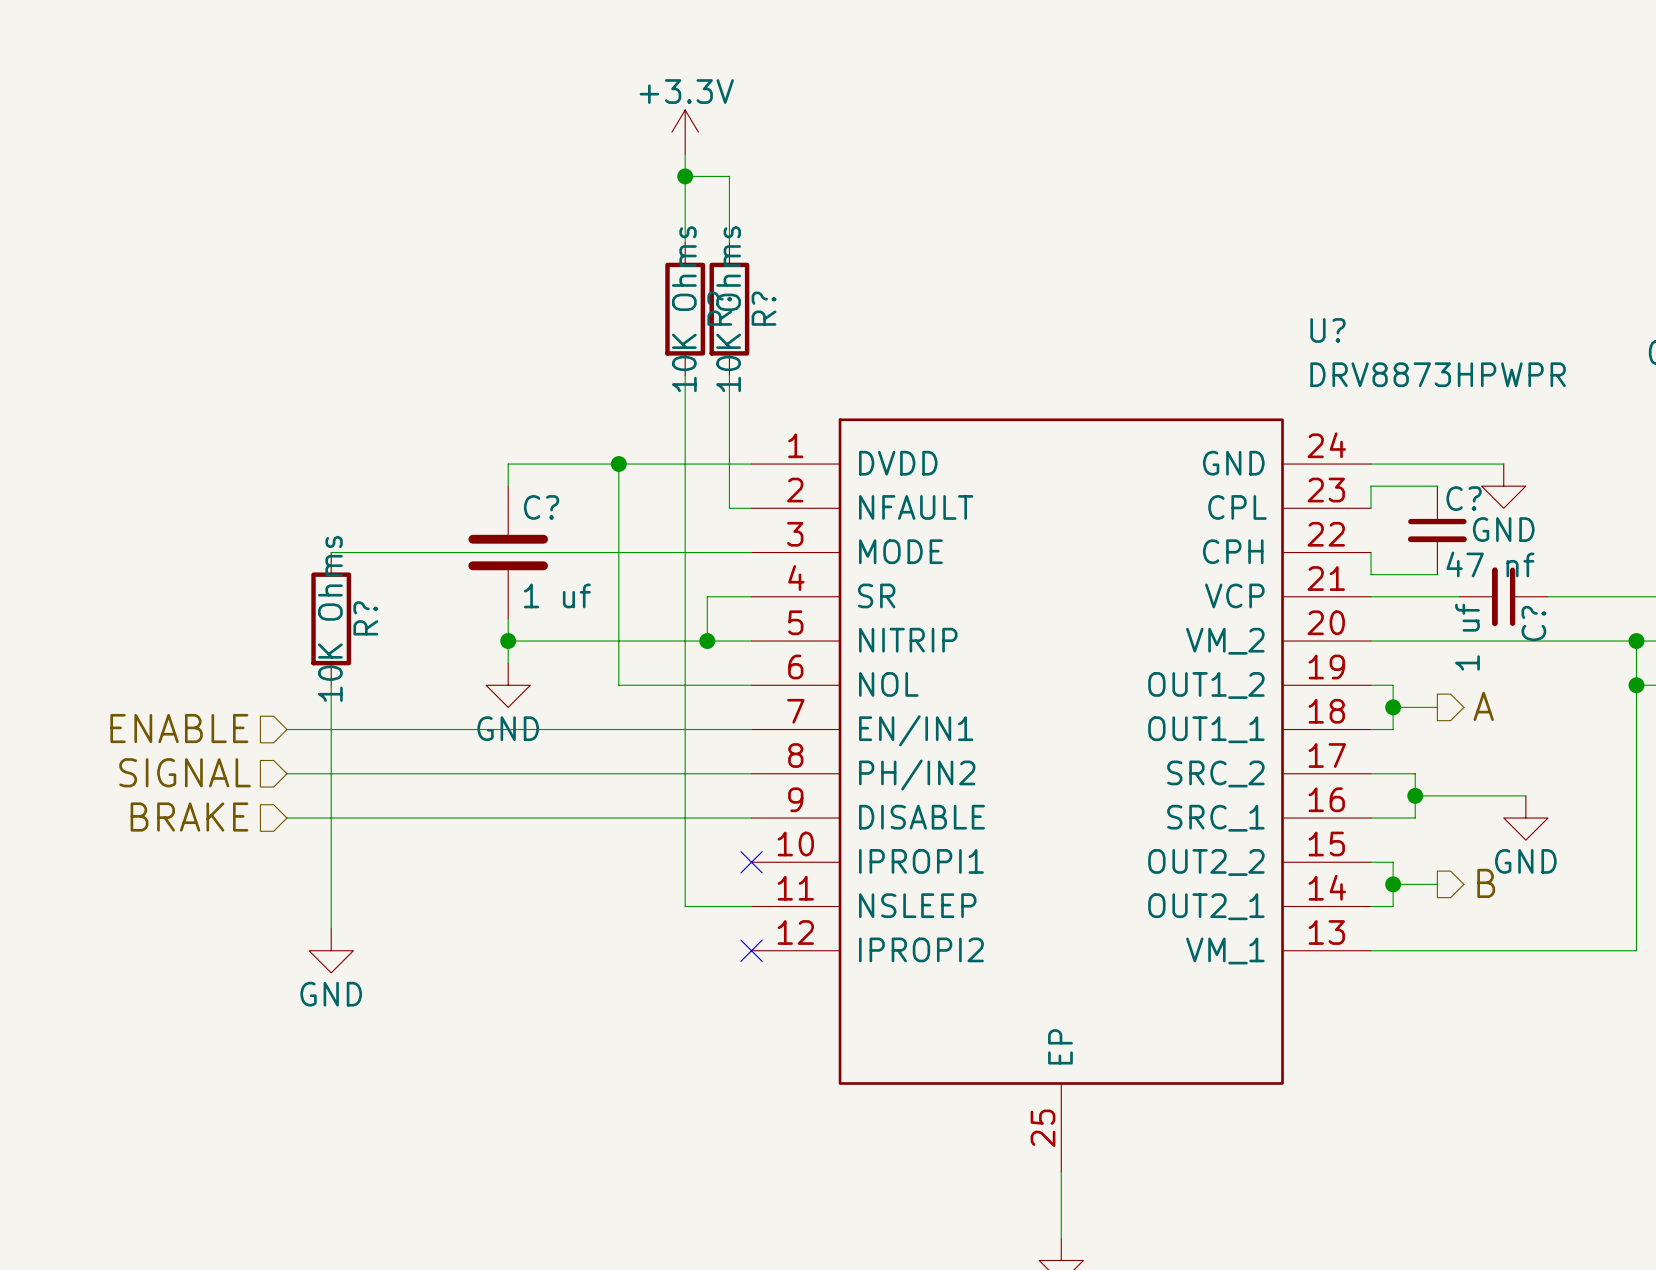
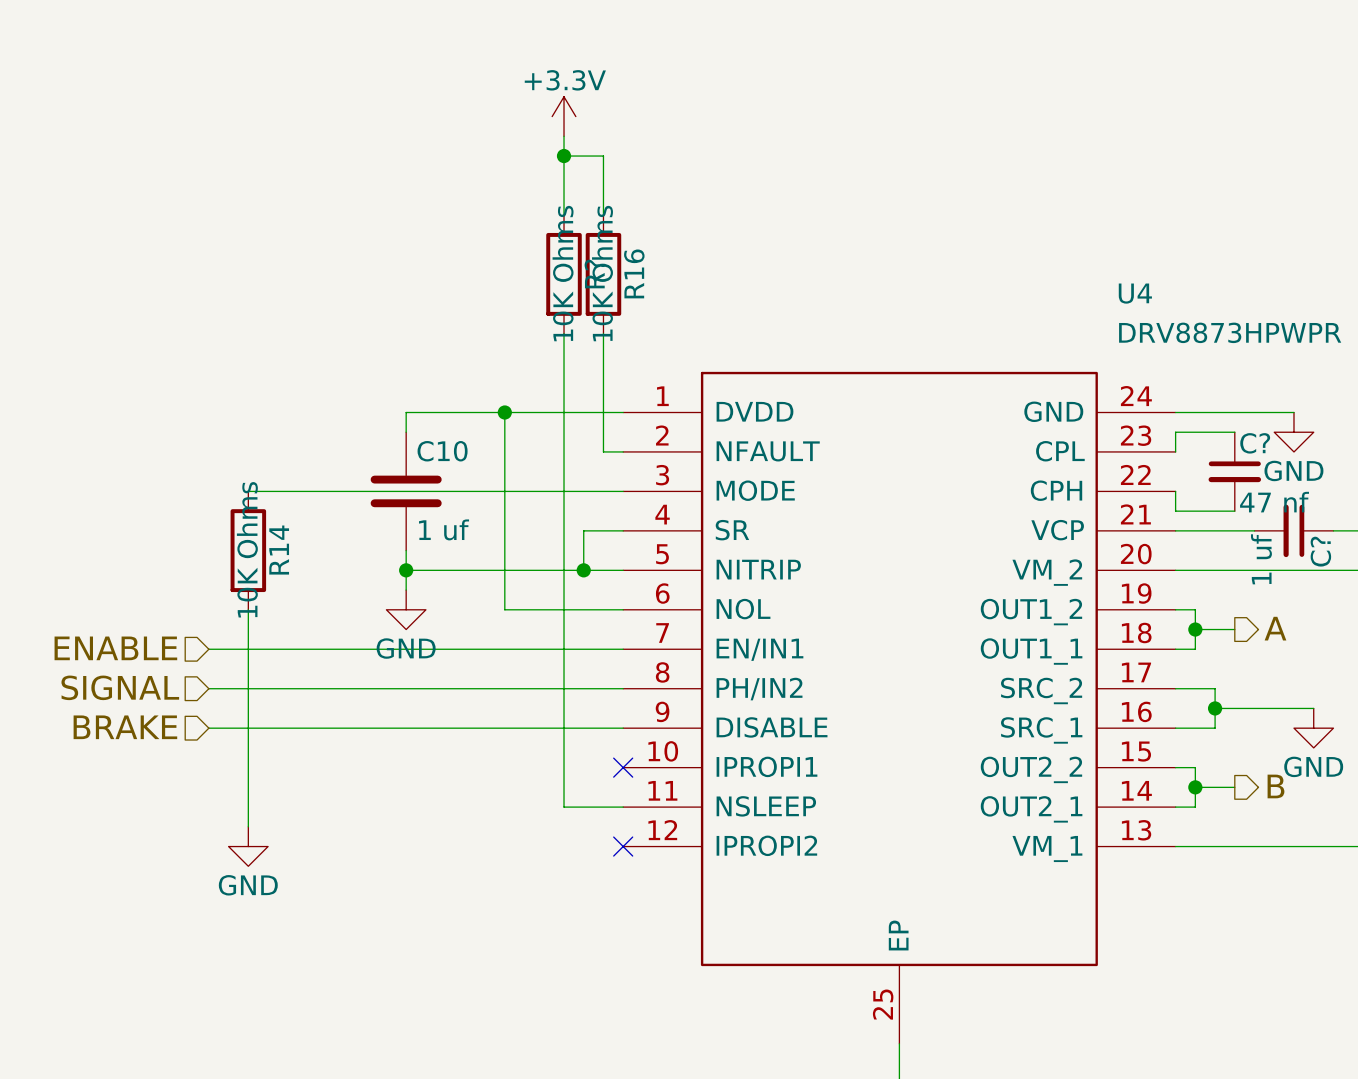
R? name: R? (764, 308) -> R16 (634, 273)
U? name: U? (1327, 330) -> U4 (1135, 293)
C? name: C? (541, 507) -> C10 (442, 451)
R? name: R? (365, 618) -> R14 (279, 550)

